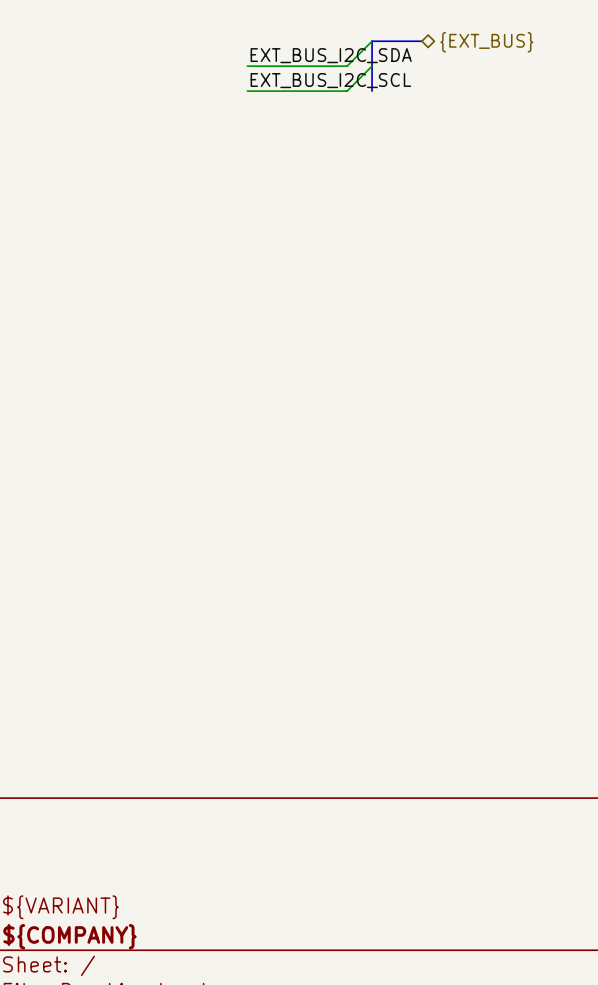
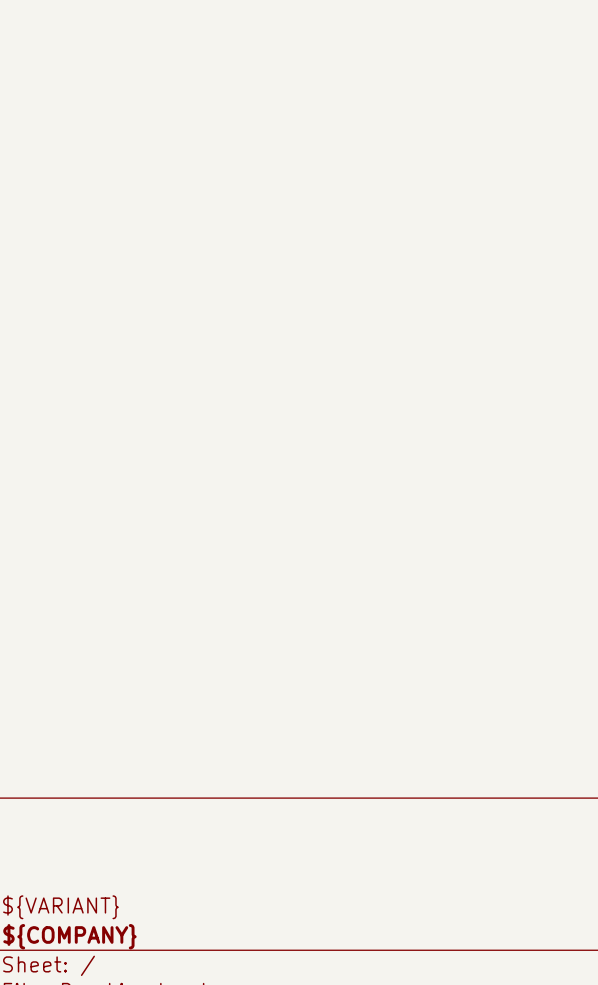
wire: (372, 41) (347, 66) (247, 66) -> none
bus: (421, 41) (372, 41) (372, 91) -> none
hierarchical label: {EXT_BUS} (486, 42) -> none
label: EXT_BUS_I2C_SDA (331, 55) -> none
wire: (372, 66) (347, 91) (247, 91) -> none
label: EXT_BUS_I2C_SCL (330, 80) -> none

